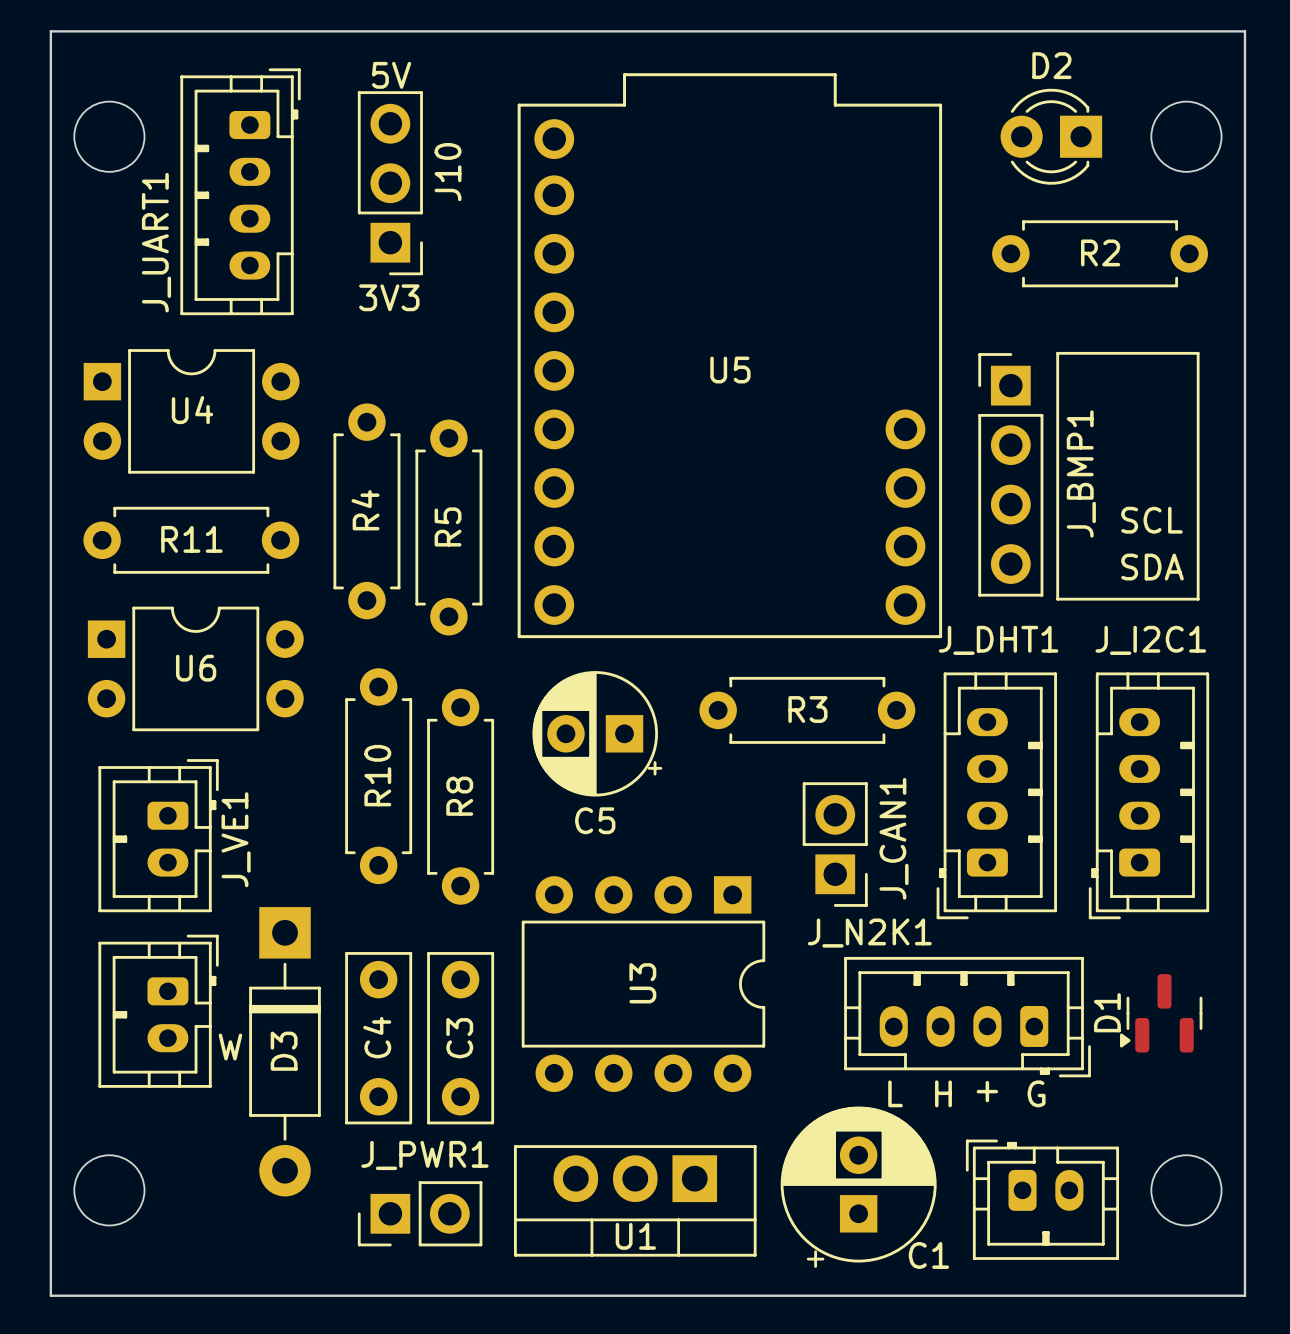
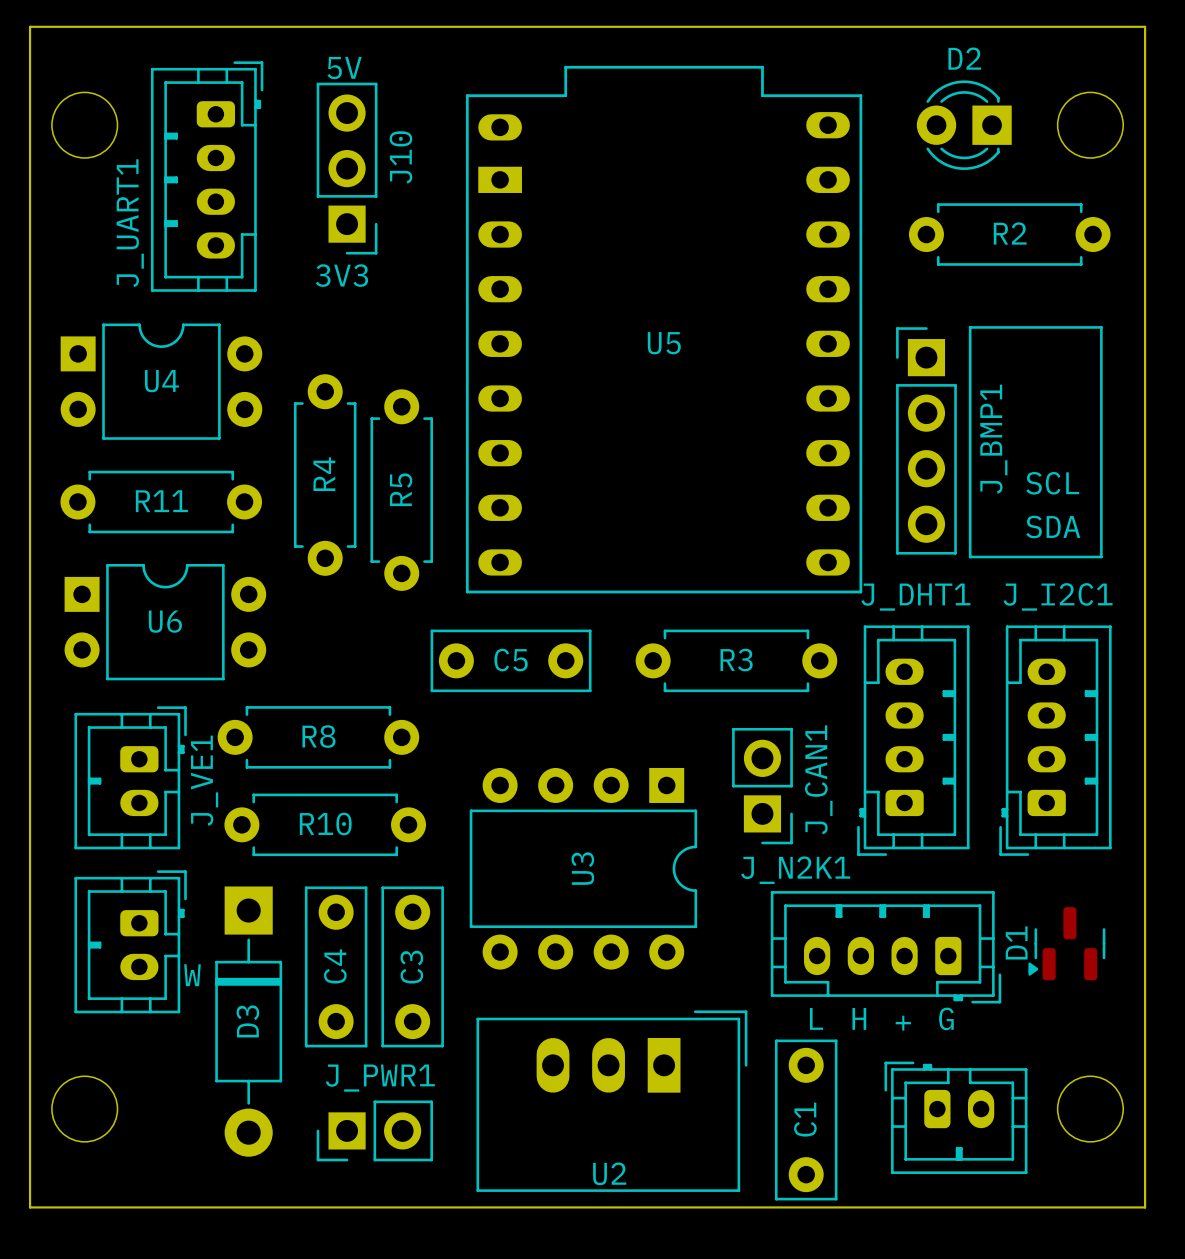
U5 footprint: [517, 73, 943, 639] -> [465, 65, 863, 594]
C5 footprint: [532, 671, 663, 797] -> [430, 629, 592, 693]
R10 rotation: 0° (378, 776) -> 90° clockwise (325, 824)
R8 rotation: 0° (460, 796) -> 90° clockwise (318, 737)
C5 name position: C5 (595, 820) -> C5 (511, 660)
U3 position: (643, 984) -> (583, 868)
D3 position: (285, 1051) -> (248, 1021)
C1 footprint: [780, 1106, 937, 1268] -> [774, 1039, 838, 1201]
U2: none -> (611, 1101)
U1: (635, 1200) -> none
C1 name position: C1 (928, 1255) -> C1 (805, 1119)

